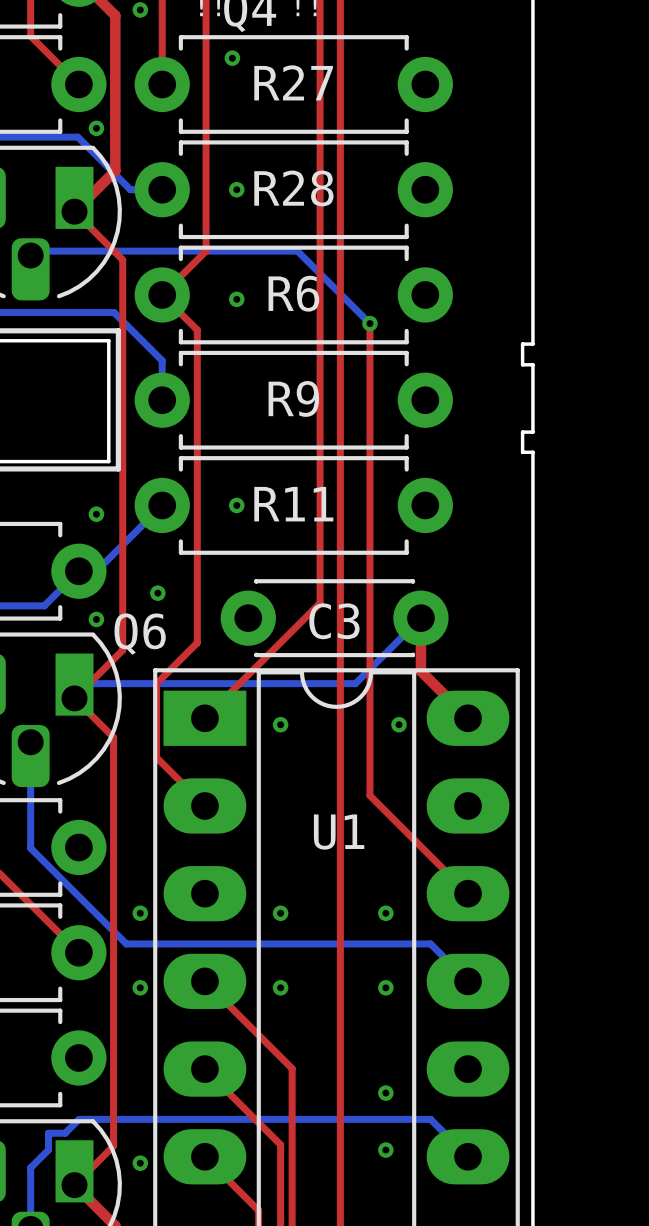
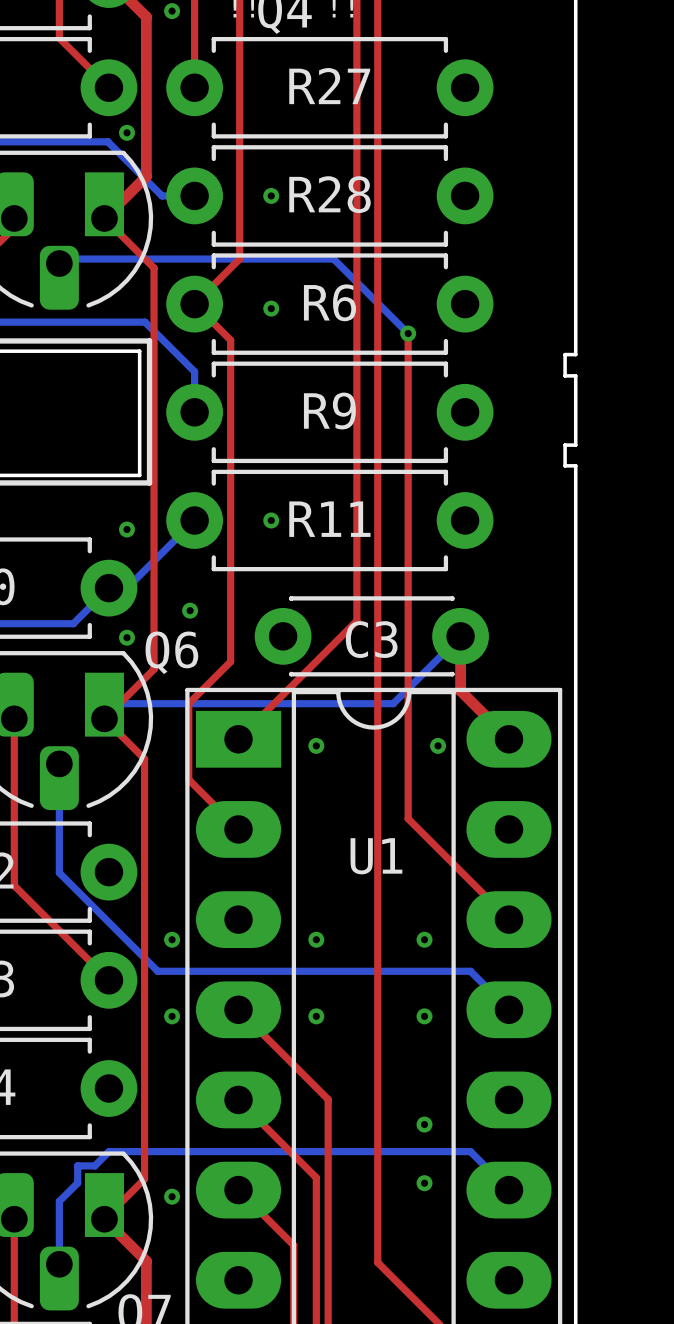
via: (232, 58) -> none

